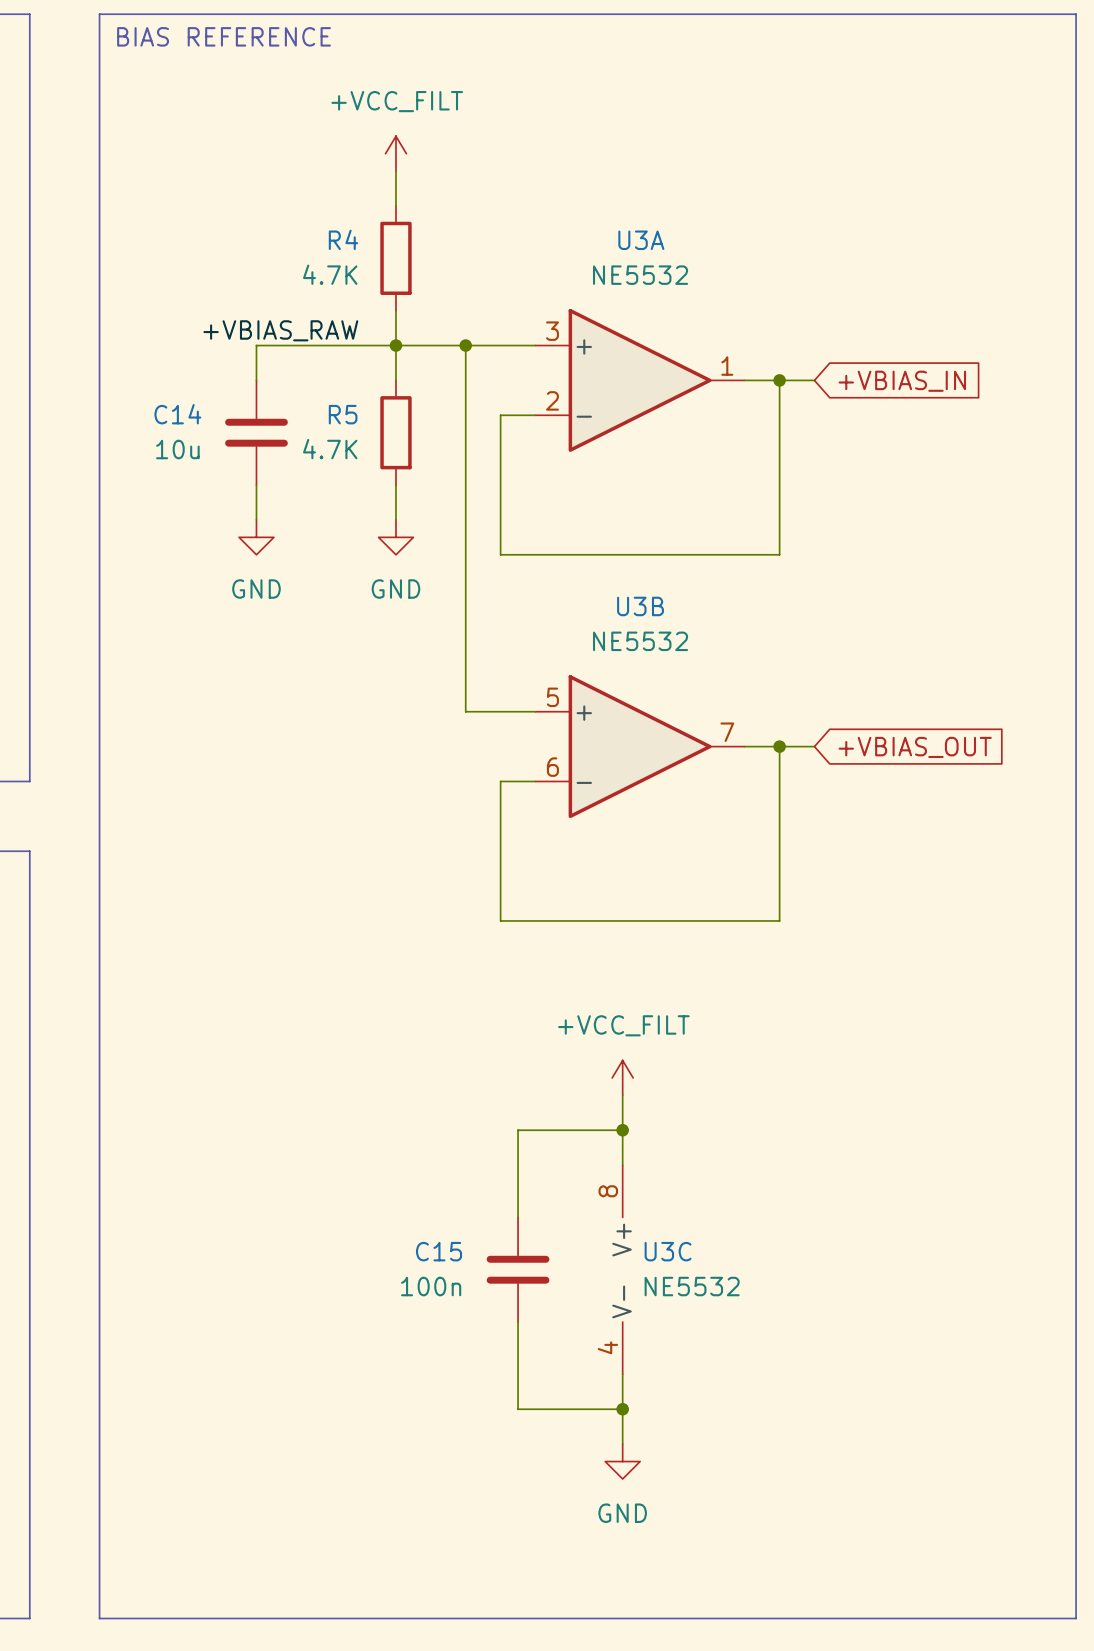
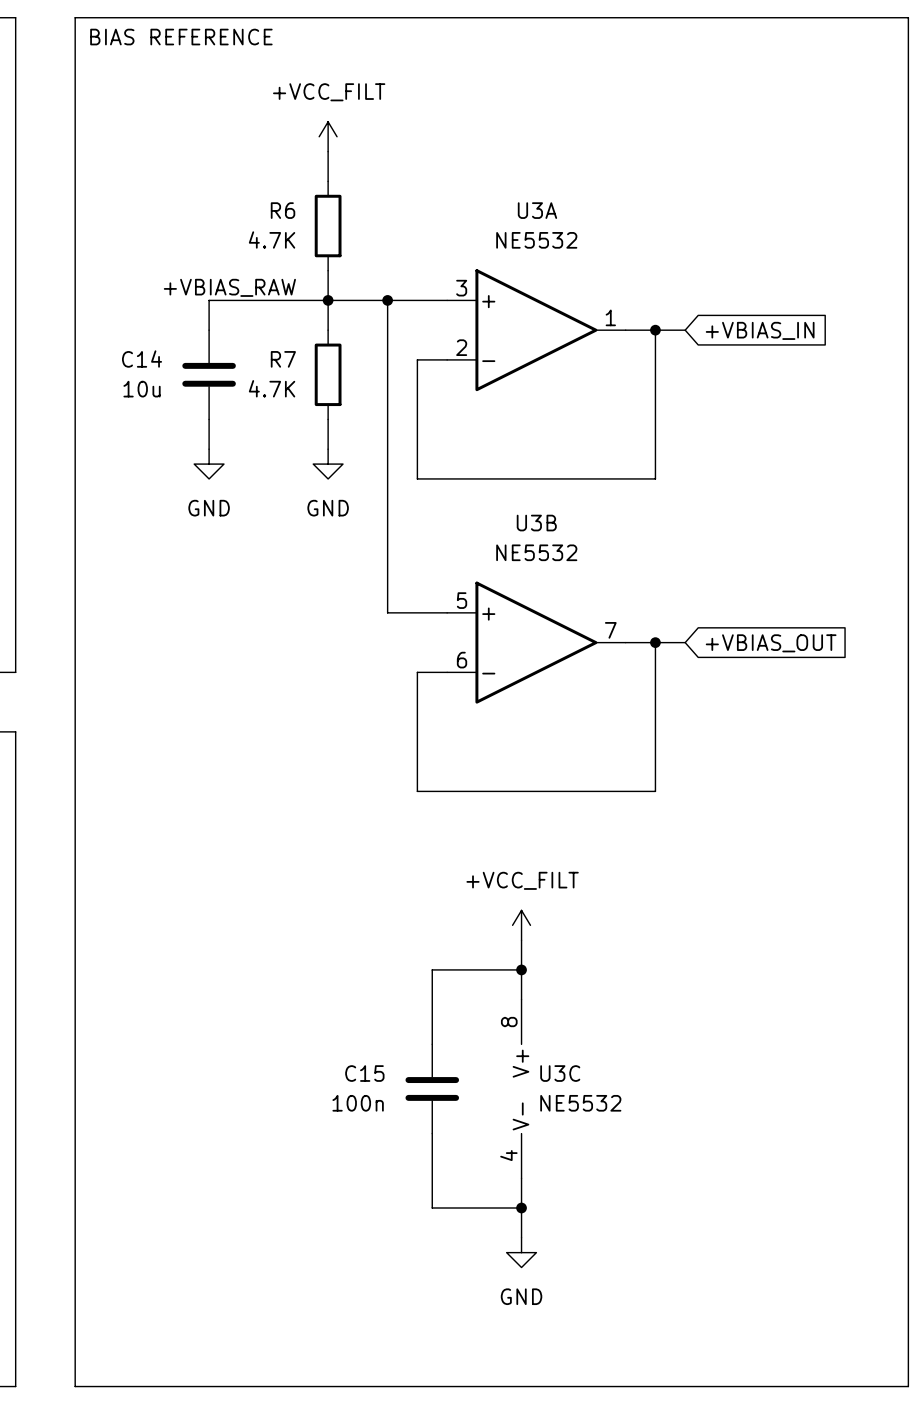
R4 name: R4 (343, 239) -> R6 (283, 210)
R5 name: R5 (343, 414) -> R7 (283, 359)

